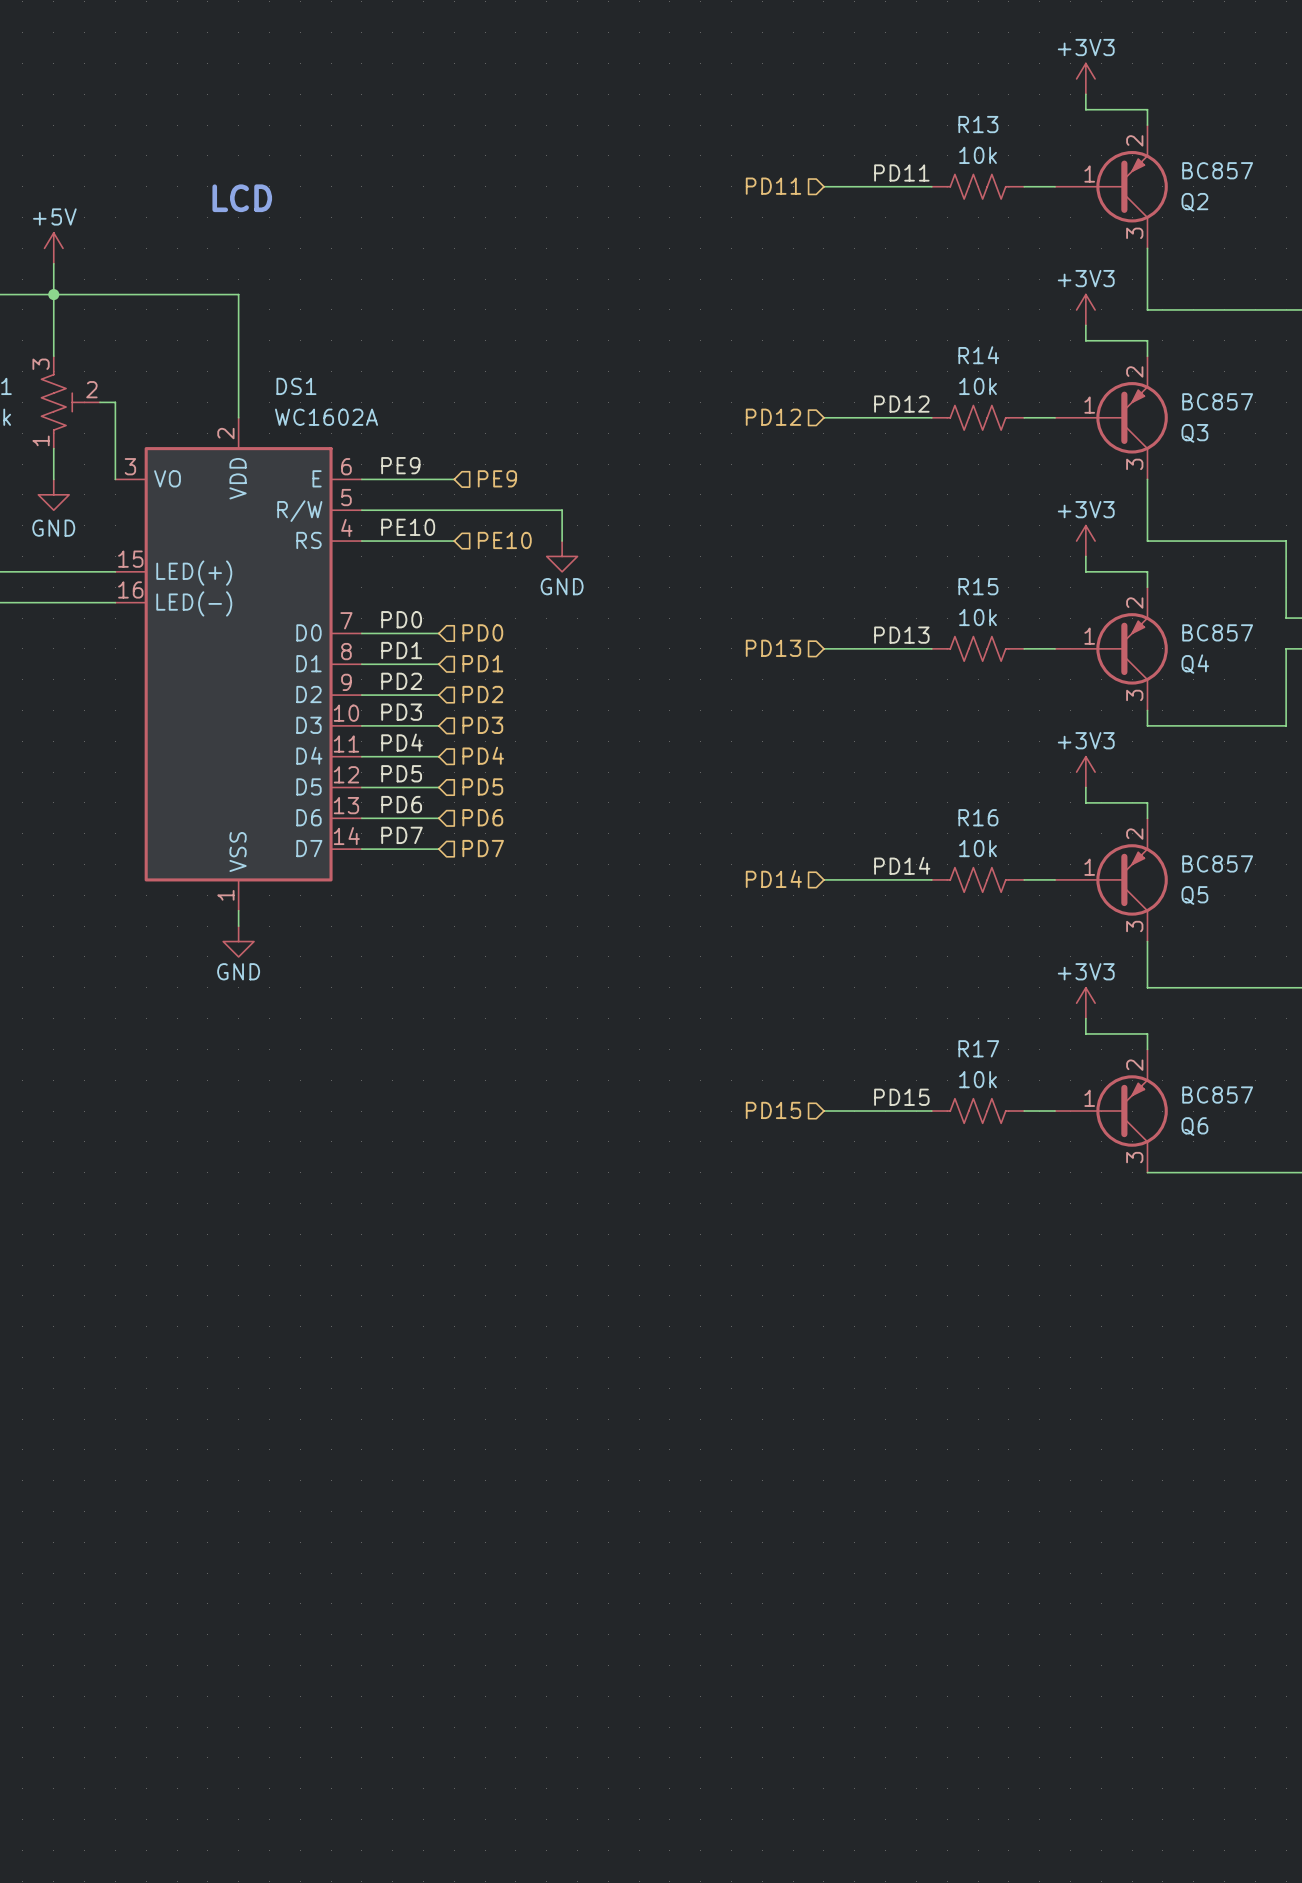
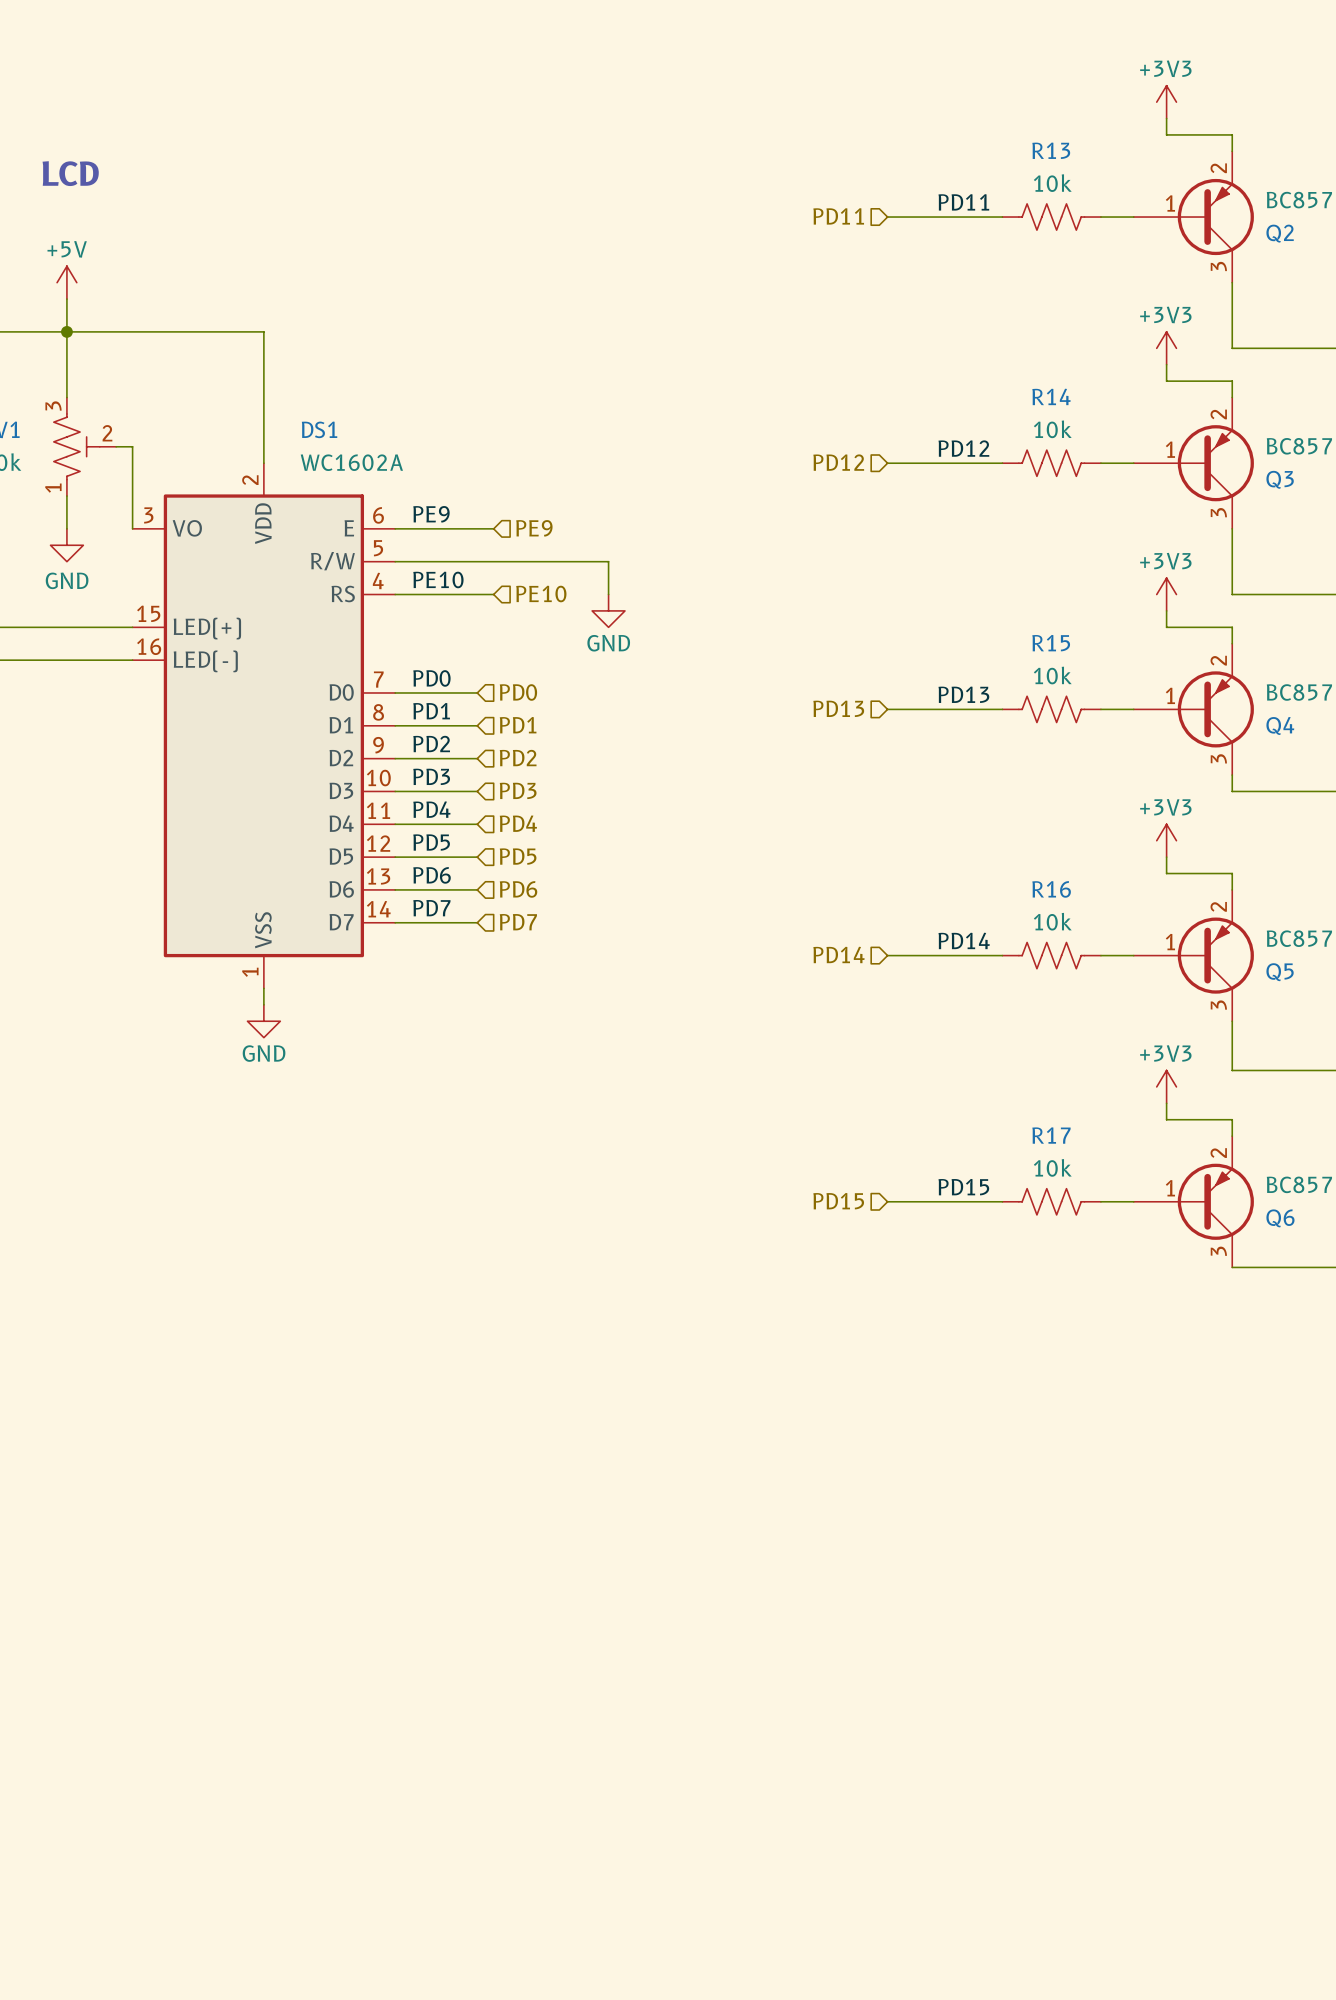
text position: LCD (242, 198) -> LCD (70, 173)

